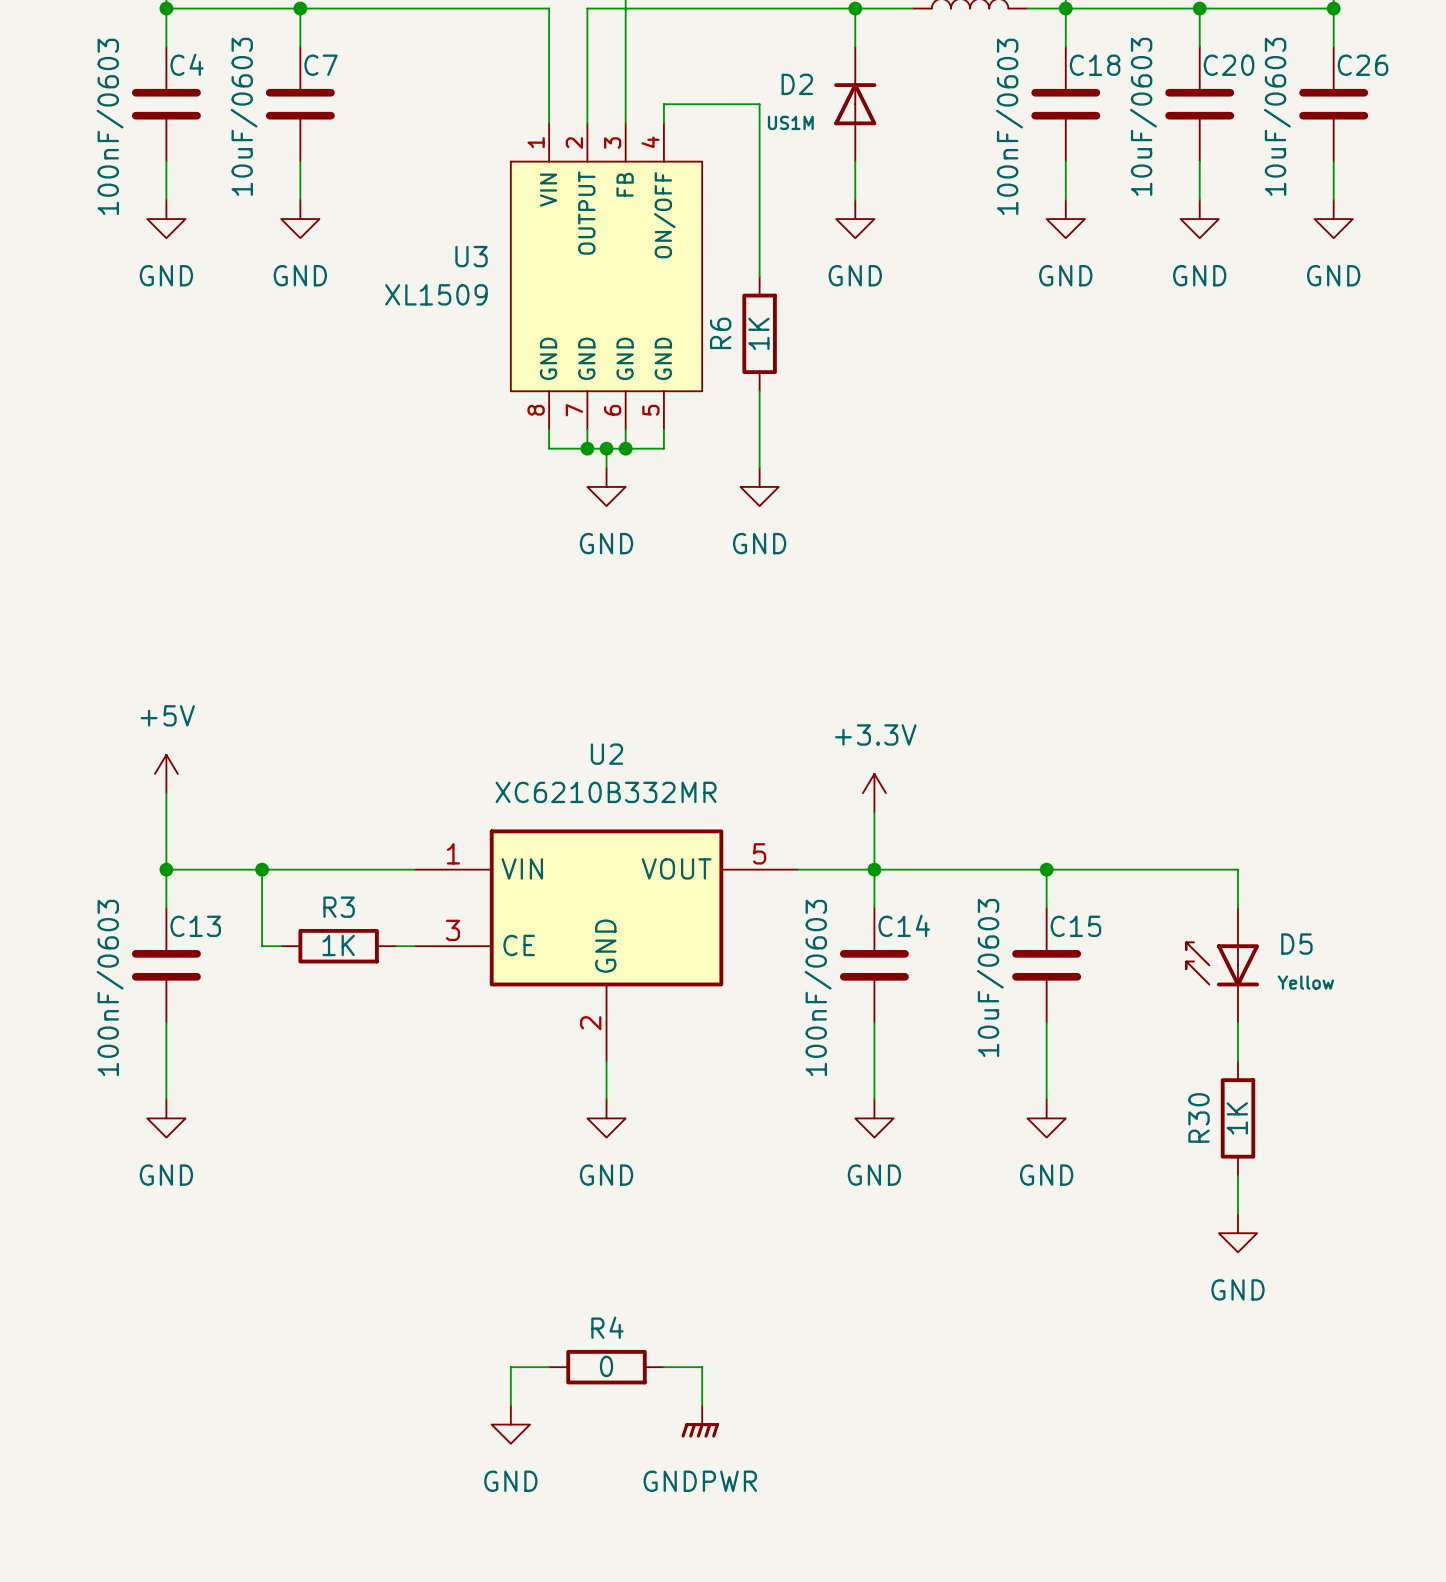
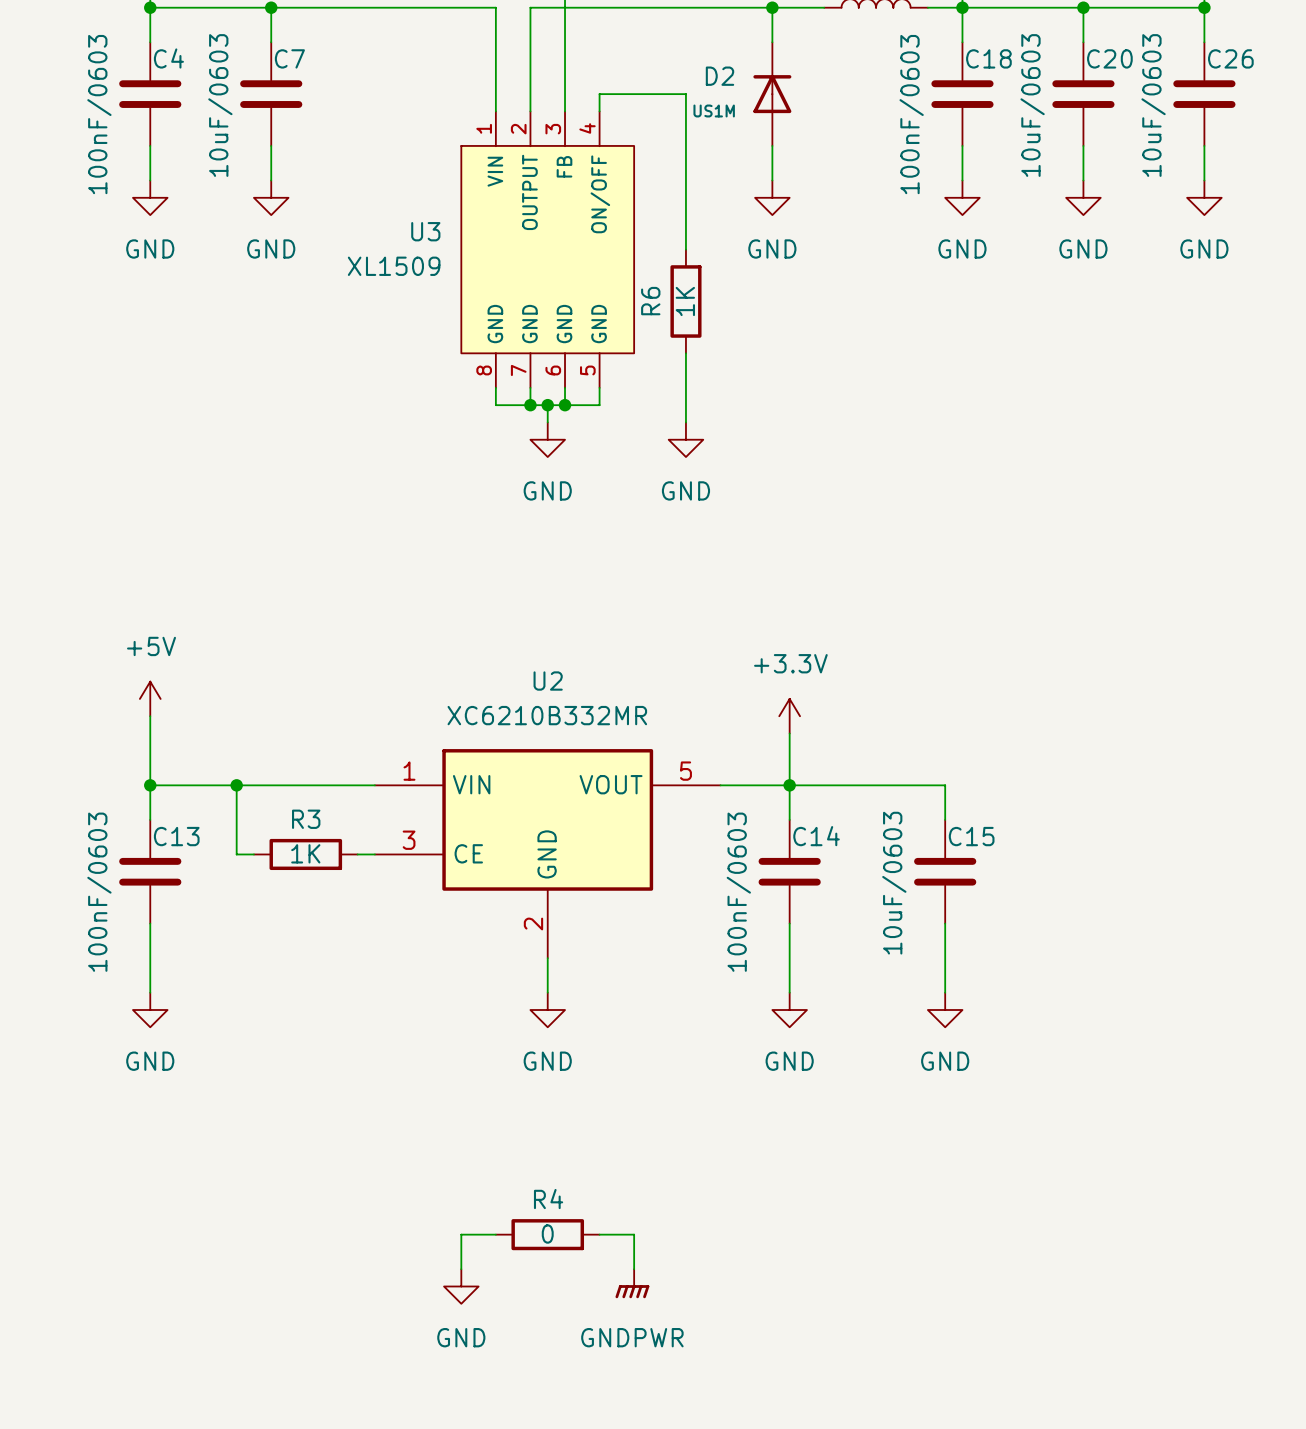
wire: (1046, 869) (1238, 869) (1238, 907) -> none
junction: (1046, 869) -> none
D5: Yellow (1222, 965) -> none
wire: (1238, 1022) (1238, 1061) -> none
R30: 1K (1238, 1118) -> none
wire: (1238, 1175) (1238, 1214) -> none
power symbol: GND (1238, 1233) -> none

